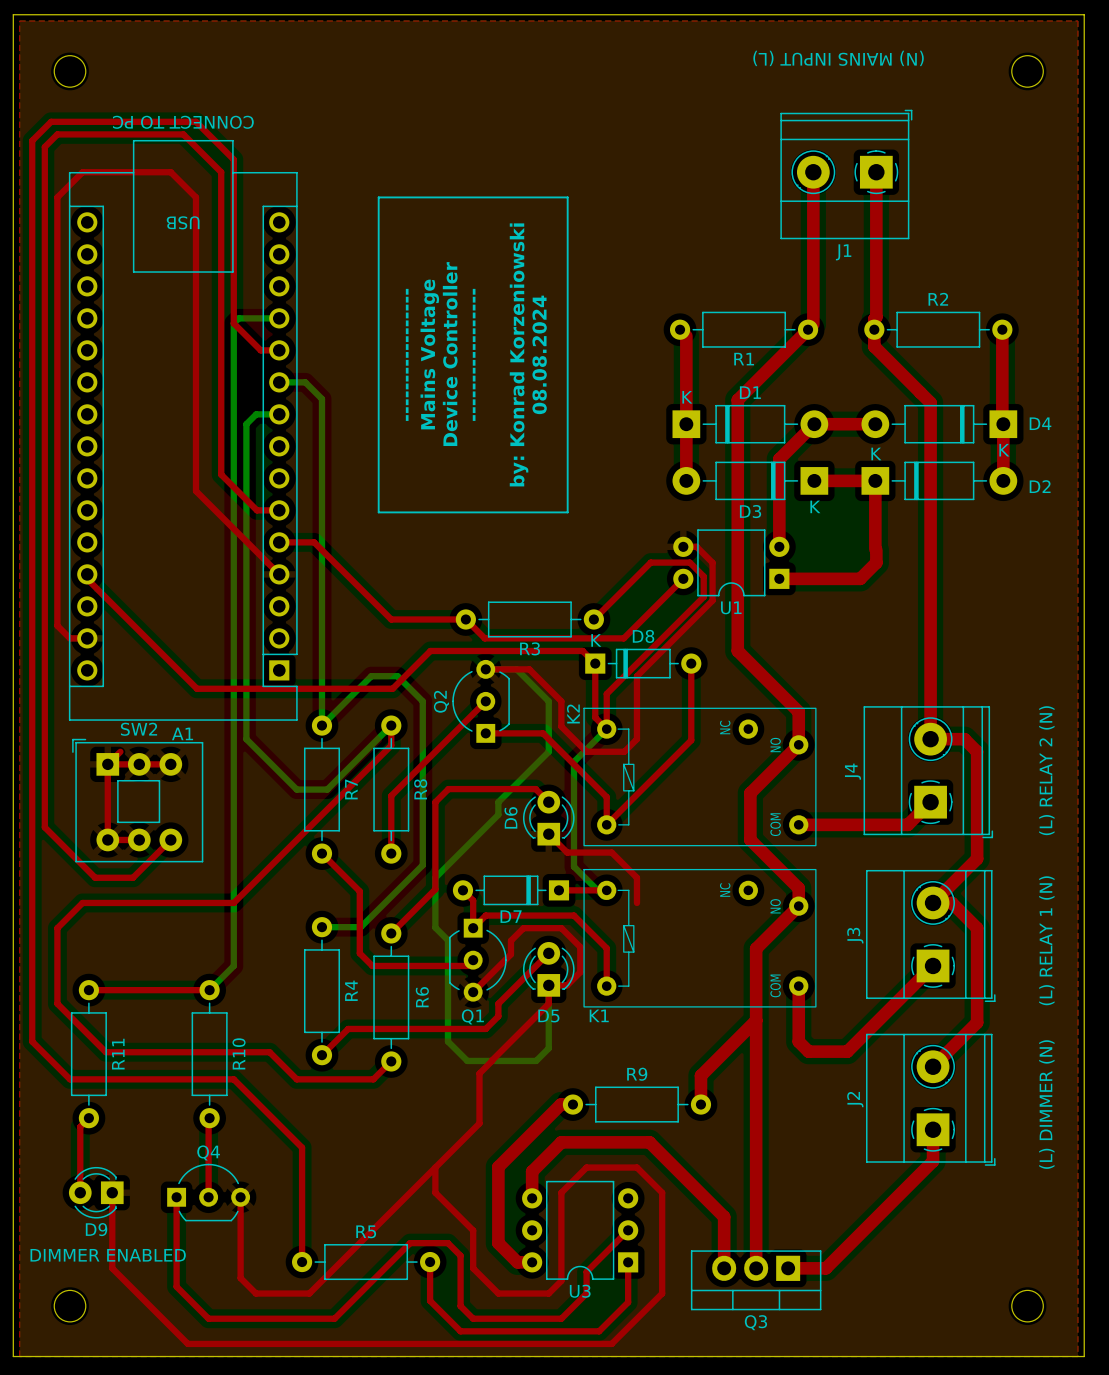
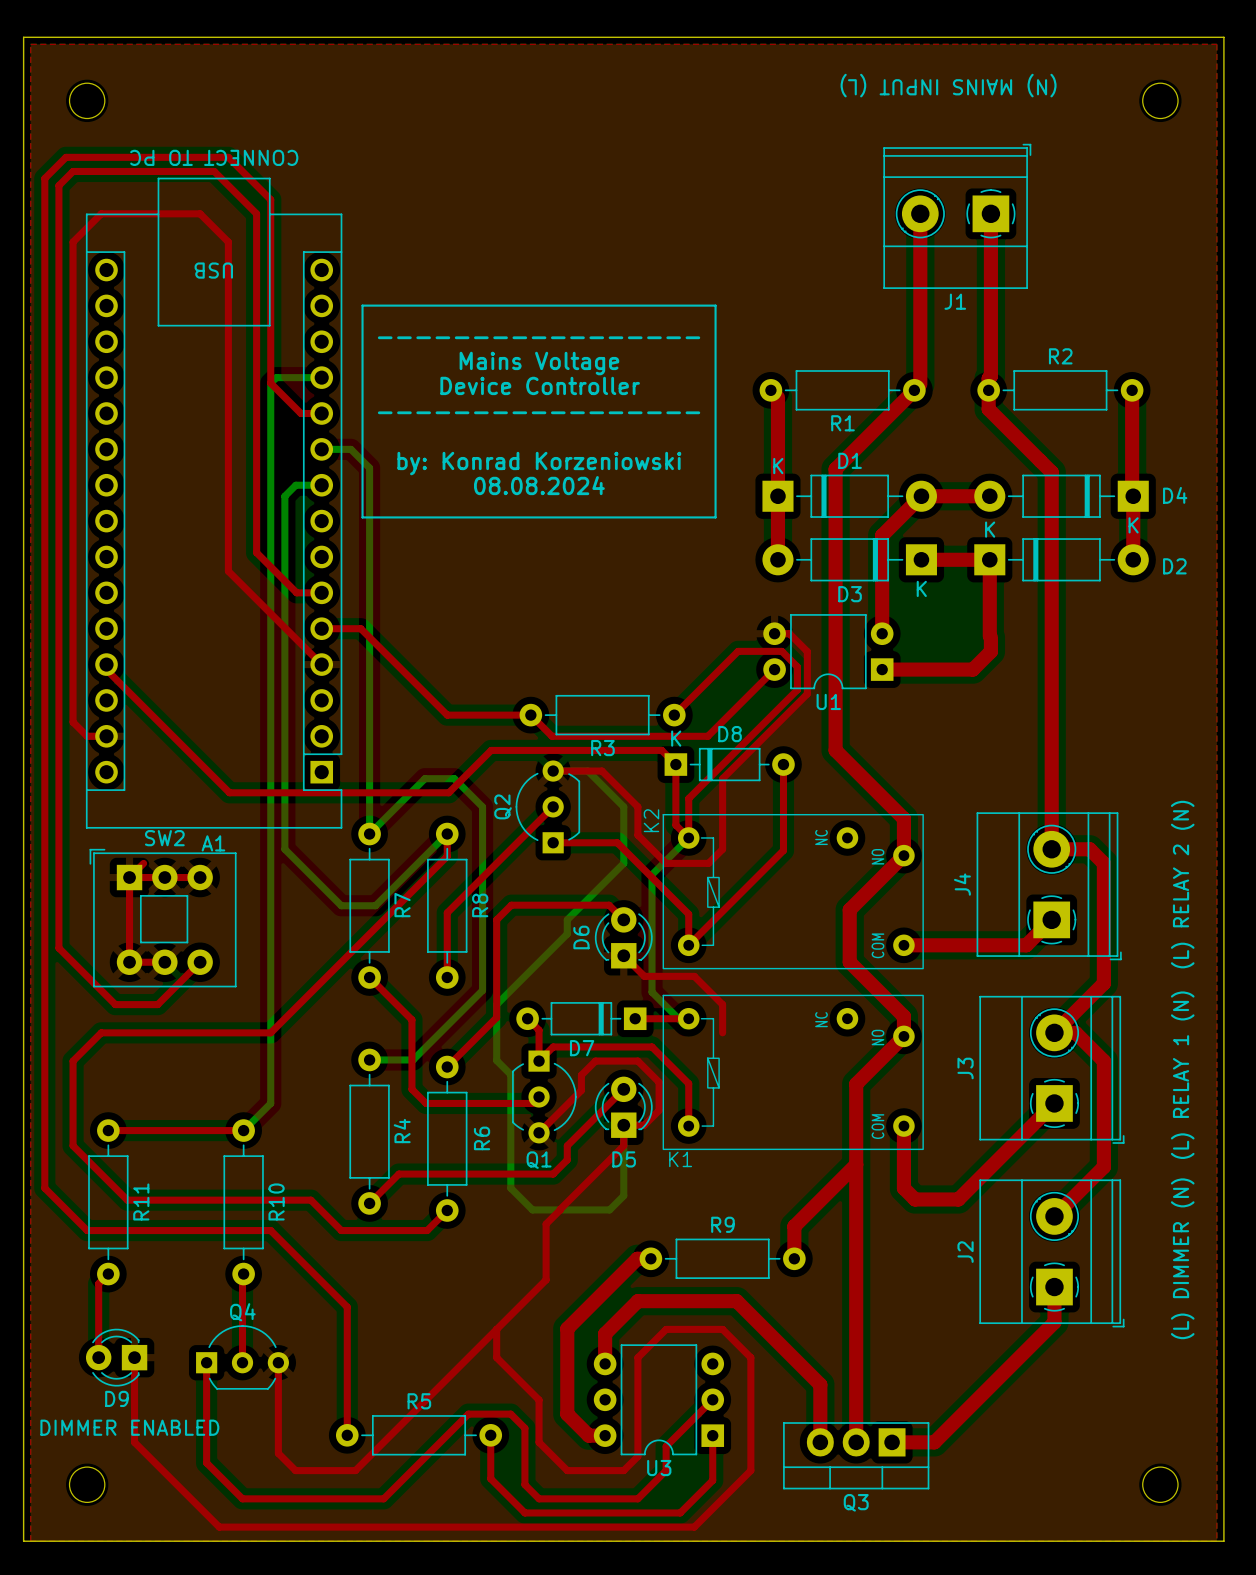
line: (378, 197) (567, 197) (567, 512) (378, 512) (378, 197) -> none
line: none -> (362, 305) (715, 305) (715, 517) (362, 517) (362, 305)
text rotation: 0° (407, 354) -> 90° clockwise (539, 337)
text rotation: 0° (429, 354) -> 90° clockwise (539, 363)
text rotation: 0° (450, 354) -> 90° clockwise (540, 385)
text rotation: 0° (474, 354) -> 90° clockwise (539, 412)
text rotation: 0° (519, 354) -> 90° clockwise (539, 463)
text rotation: 0° (539, 354) -> 90° clockwise (539, 485)

